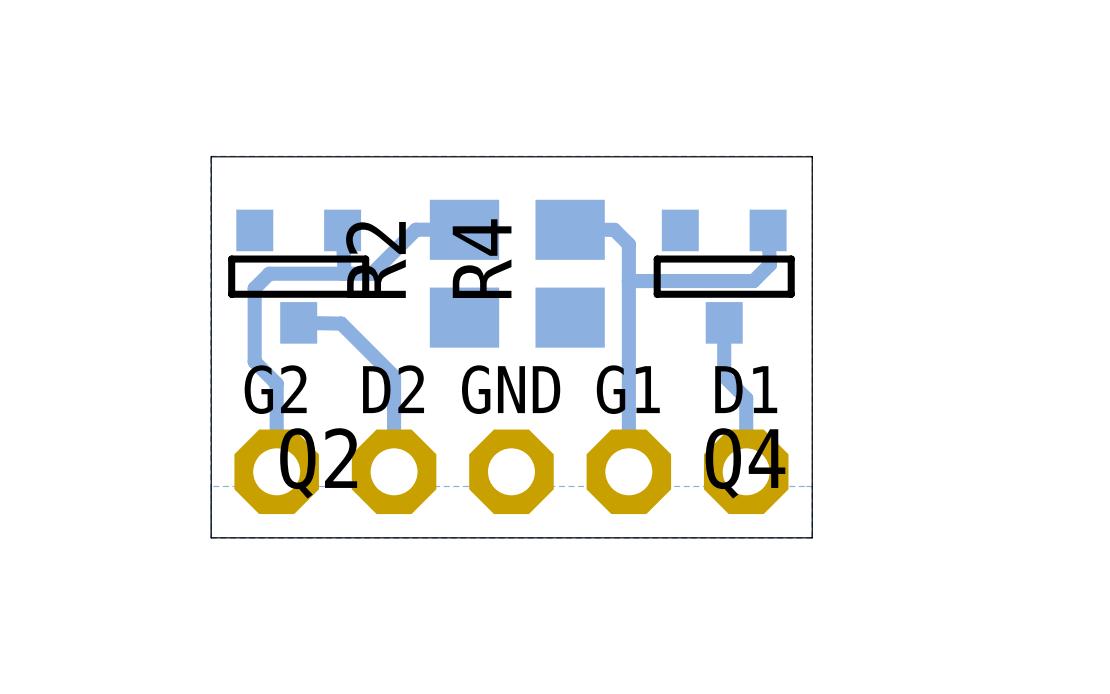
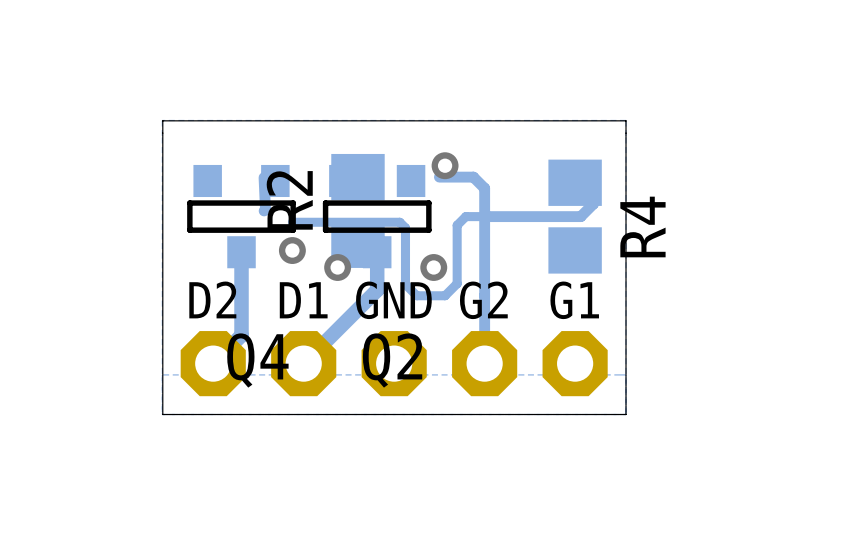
via: none -> (445, 165)
track: (464, 229) (416, 229) (372, 273) (269, 273) (254, 288) (254, 361) (276, 383) (276, 471) -> (241, 252) (241, 335) (213, 363)
R4 name position: R4 (482, 258) -> R4 (642, 226)
R4 position: (570, 273) -> (575, 216)
Q2 position: (298, 276) -> (377, 216)
Q4 position: (724, 276) -> (241, 216)
track: none -> (484, 216) (465, 216) (457, 225) (457, 283) (445, 295) (416, 295) (405, 284) (405, 227) (399, 222) (292, 222)
track: (298, 322) (341, 323) (394, 376) (394, 471) -> (377, 252) (377, 290) (303, 363)
track: (724, 322) (724, 376) (746, 398) (746, 471) -> none
via: none -> (292, 250)
via: none -> (337, 267)
via: none -> (433, 267)
text: G2 (275, 389) -> D2 (212, 299)
text: D2 (393, 389) -> D1 (303, 300)
text: G1 (628, 389) -> G2 (483, 300)
text: D1 (746, 389) -> G1 (574, 300)

